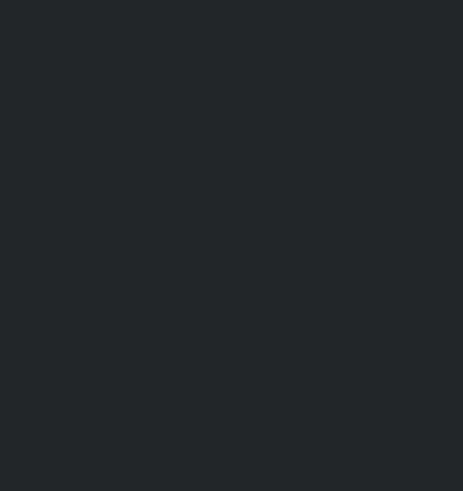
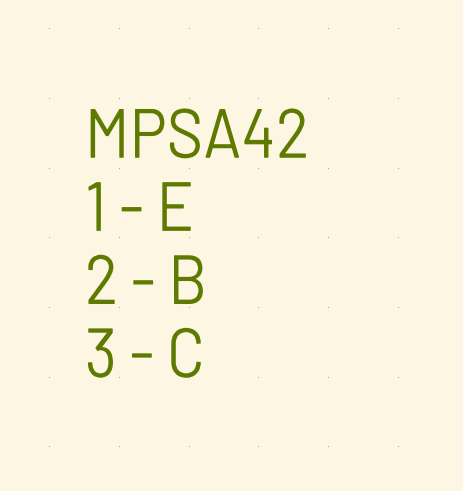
text: none -> MPSA42 (198, 133)
text: none -> 1 - E (139, 206)
text: none -> 2 - B (145, 279)
text: none -> 3 - C (144, 352)

